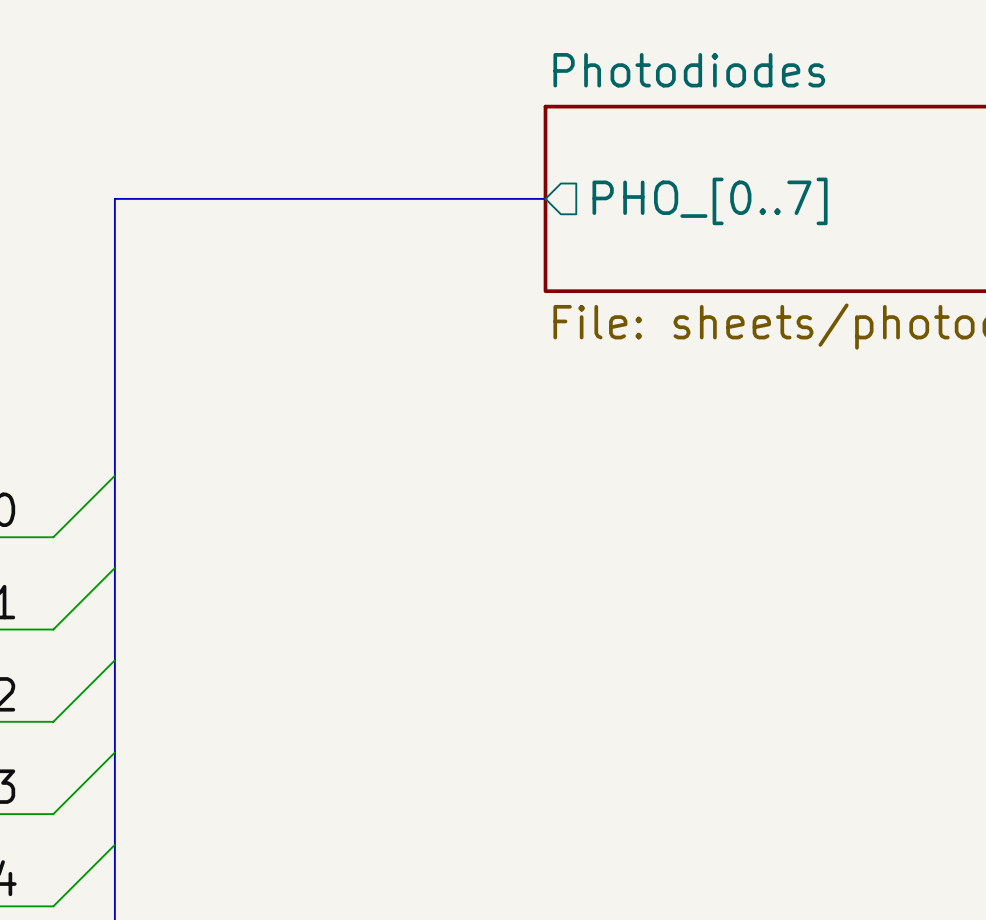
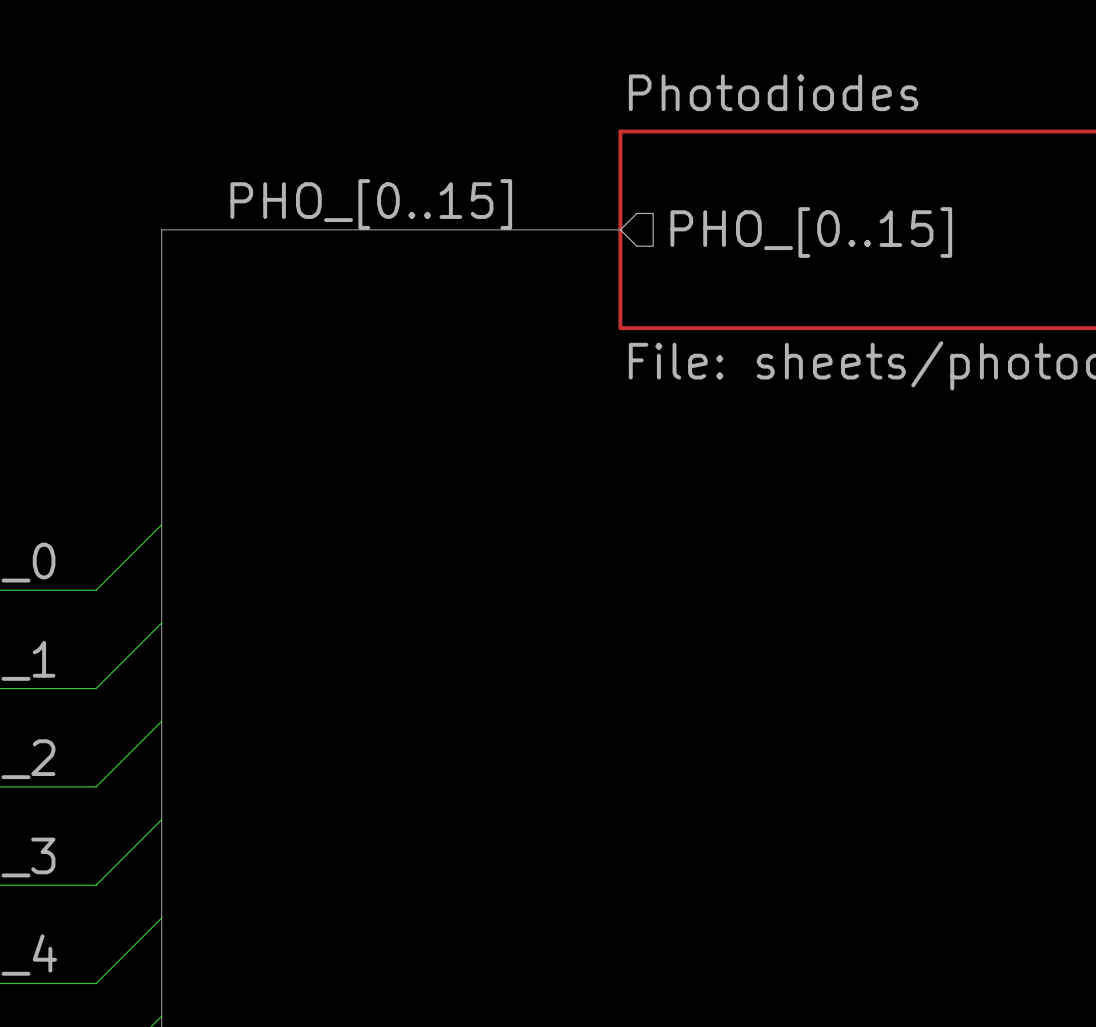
label: none -> PHO_[0..15] (371, 204)
sheet pin: PHO_[0..7] (710, 201) -> PHO_[0..15] (811, 232)

